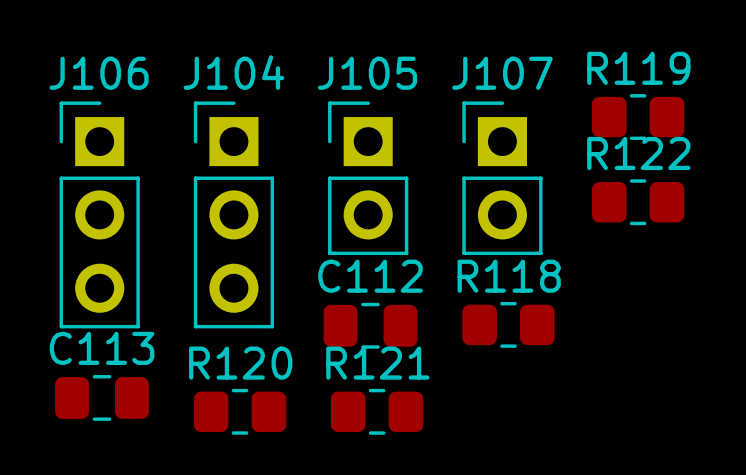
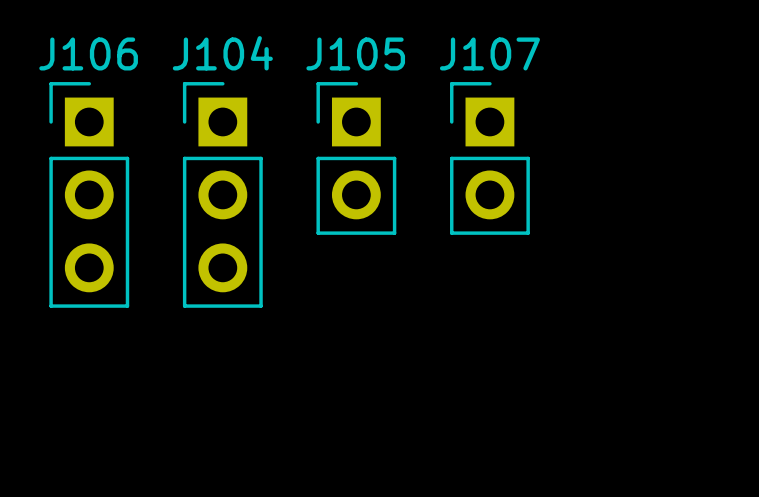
R119: (638, 117) -> none
R122: (638, 202) -> none
R118: (508, 324) -> none
C112: (370, 325) -> none
C113: (102, 397) -> none
R120: (240, 411) -> none
R121: (377, 411) -> none

